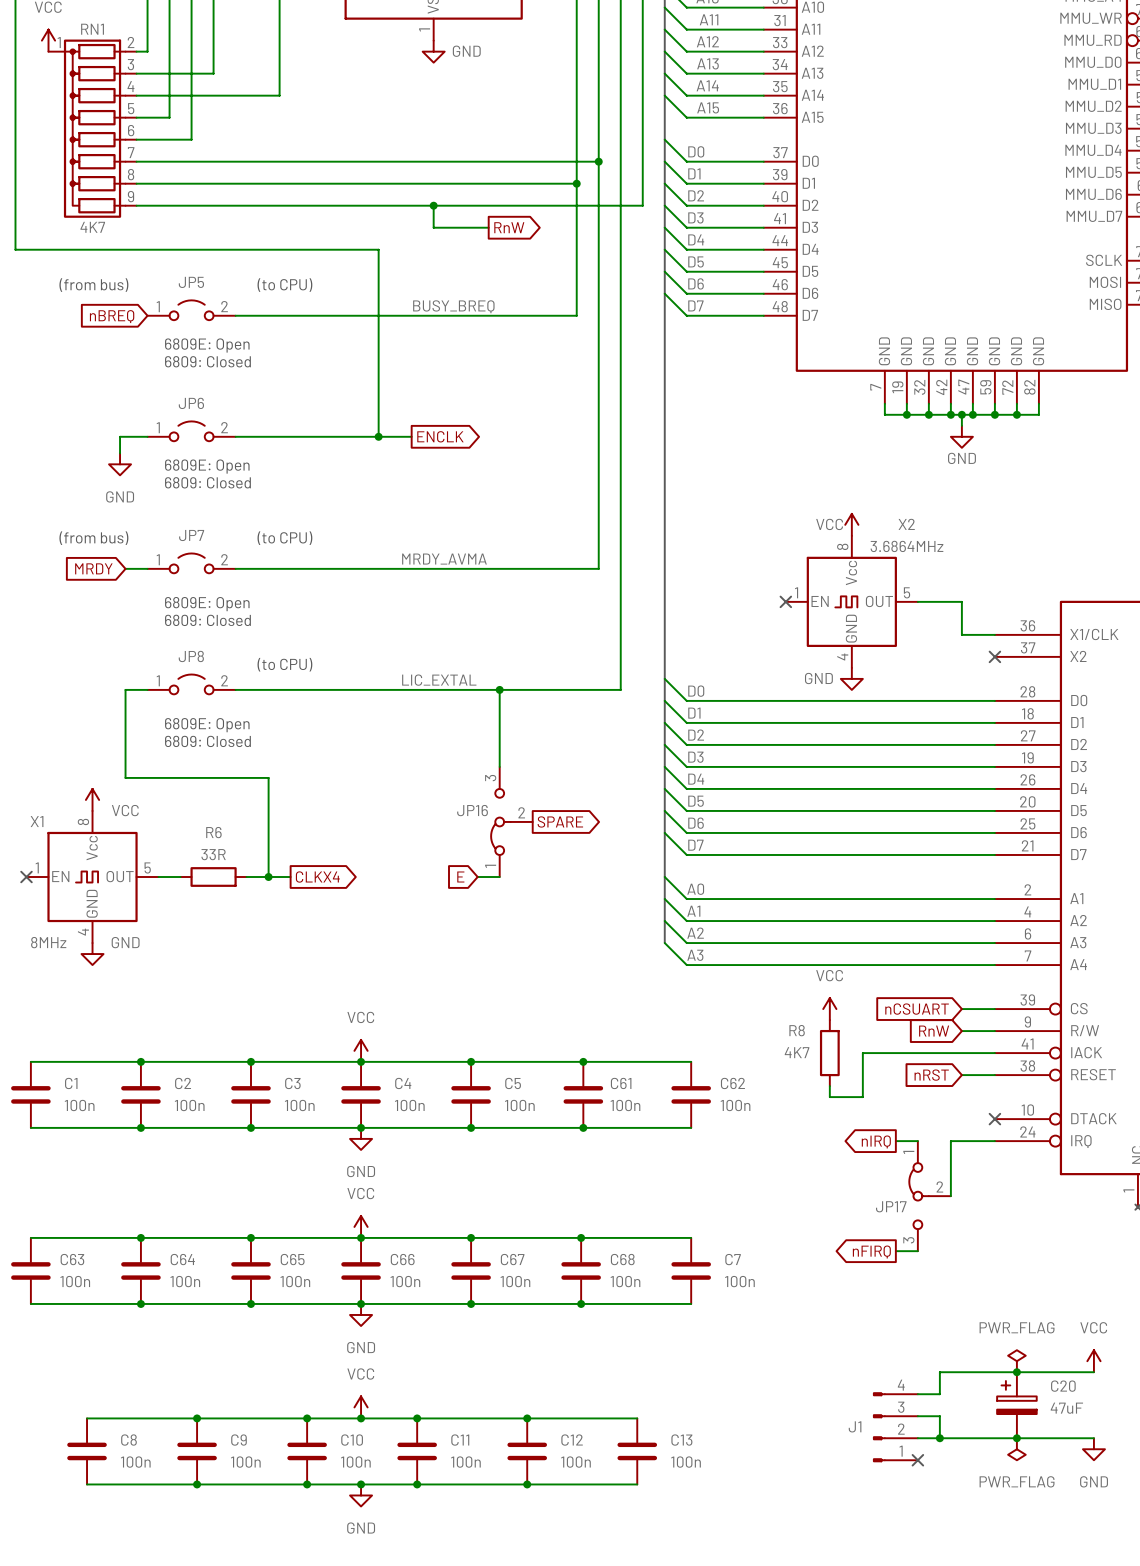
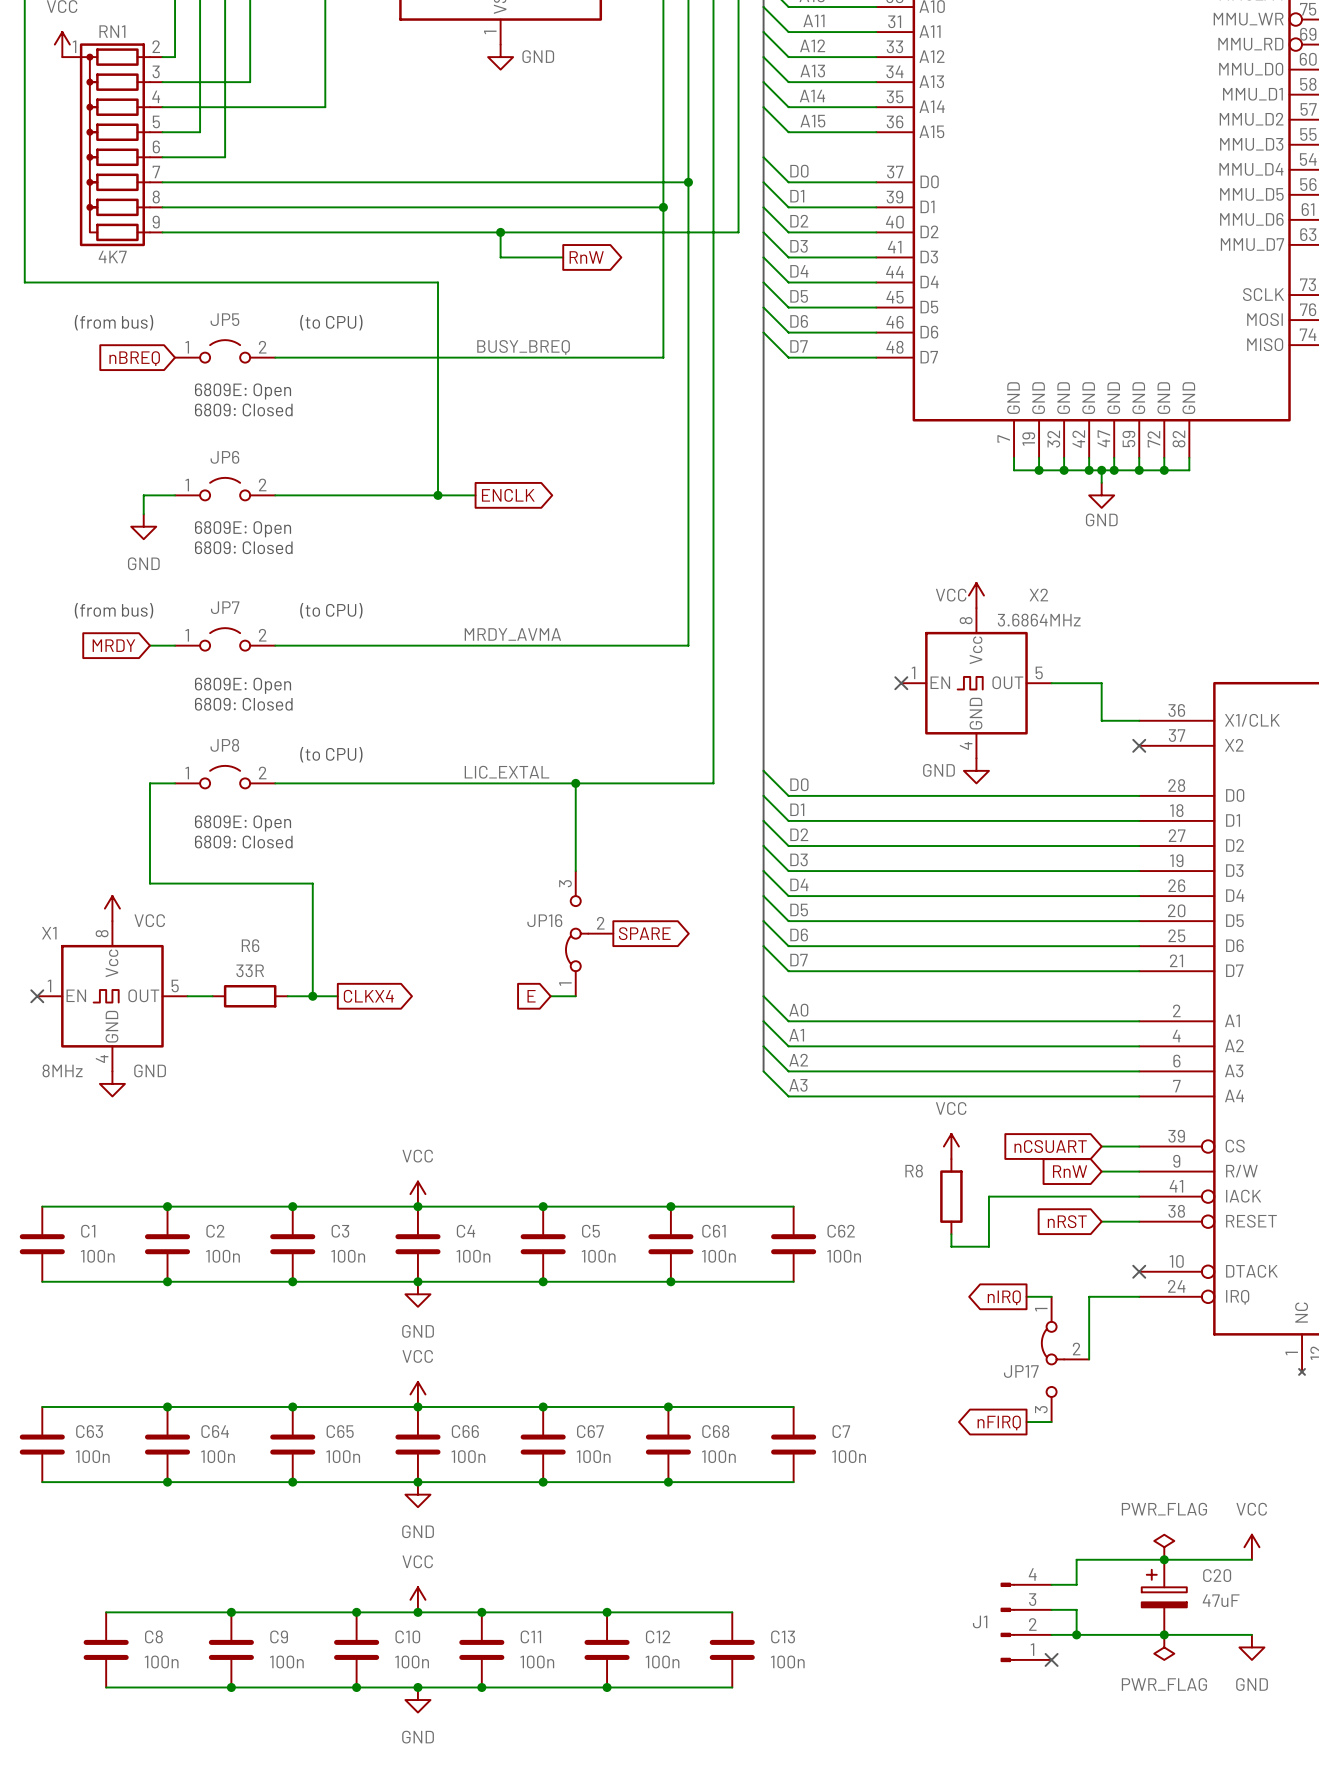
R8 value: 4K7 (797, 1052) -> none

